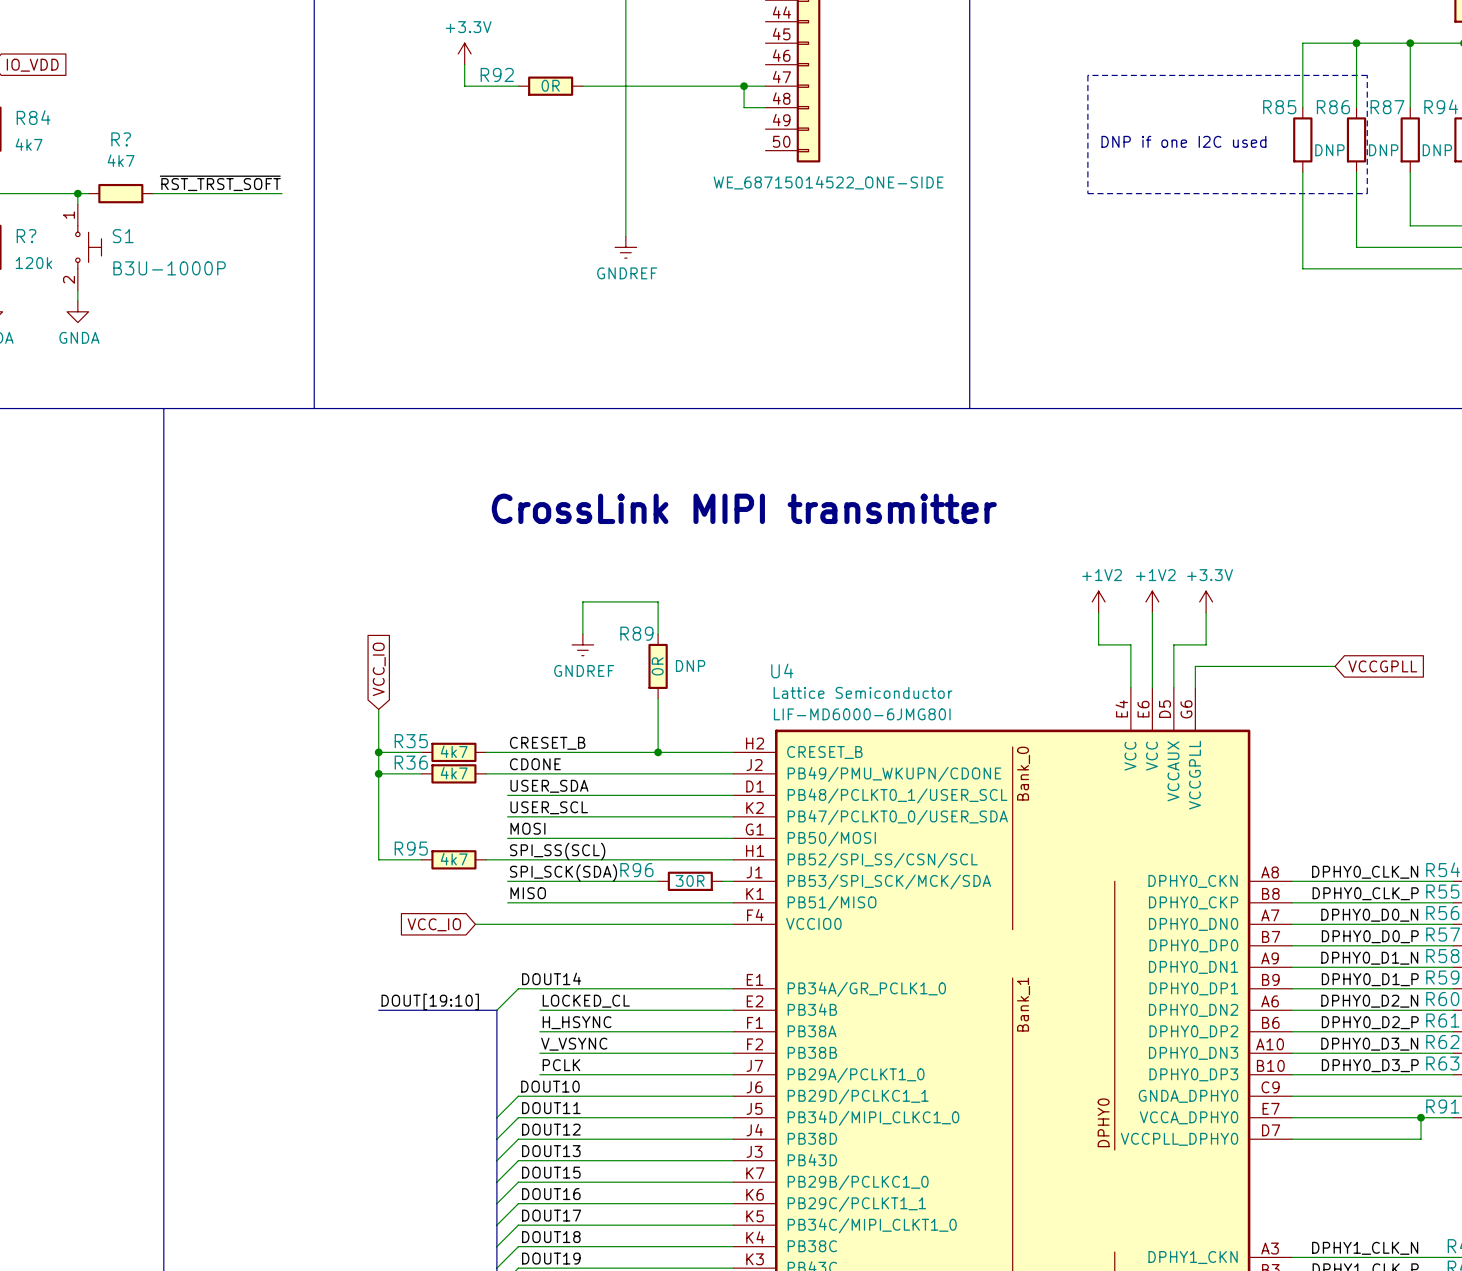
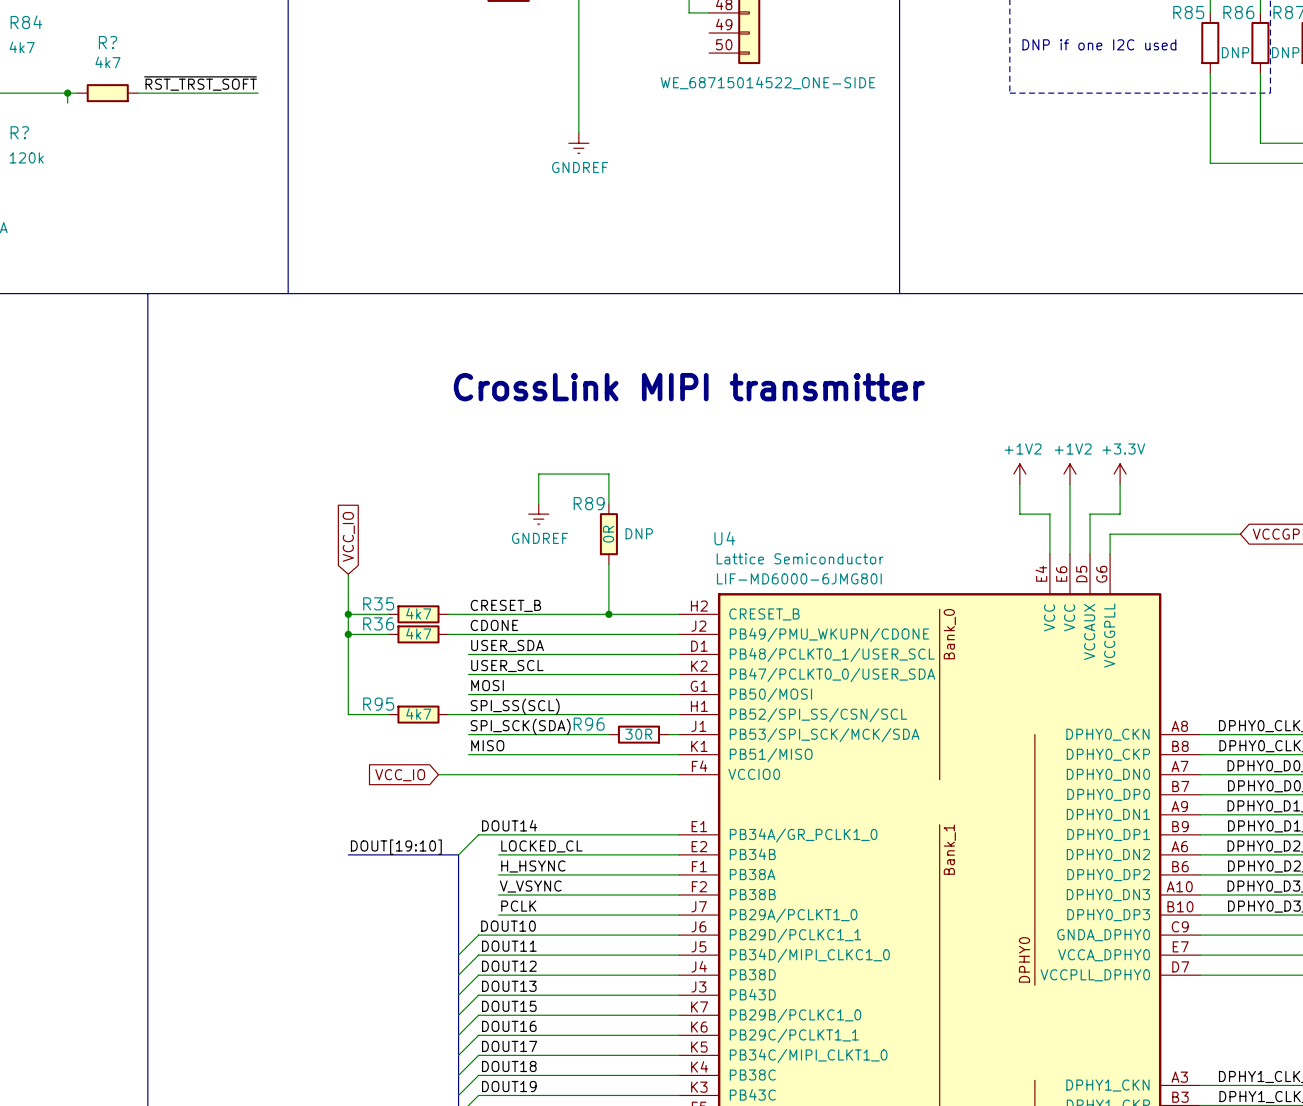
S1: B3U-1000P (88, 247) -> none
wire: (77, 290) (77, 301) -> none
power symbol: GNDA (77, 311) -> none

